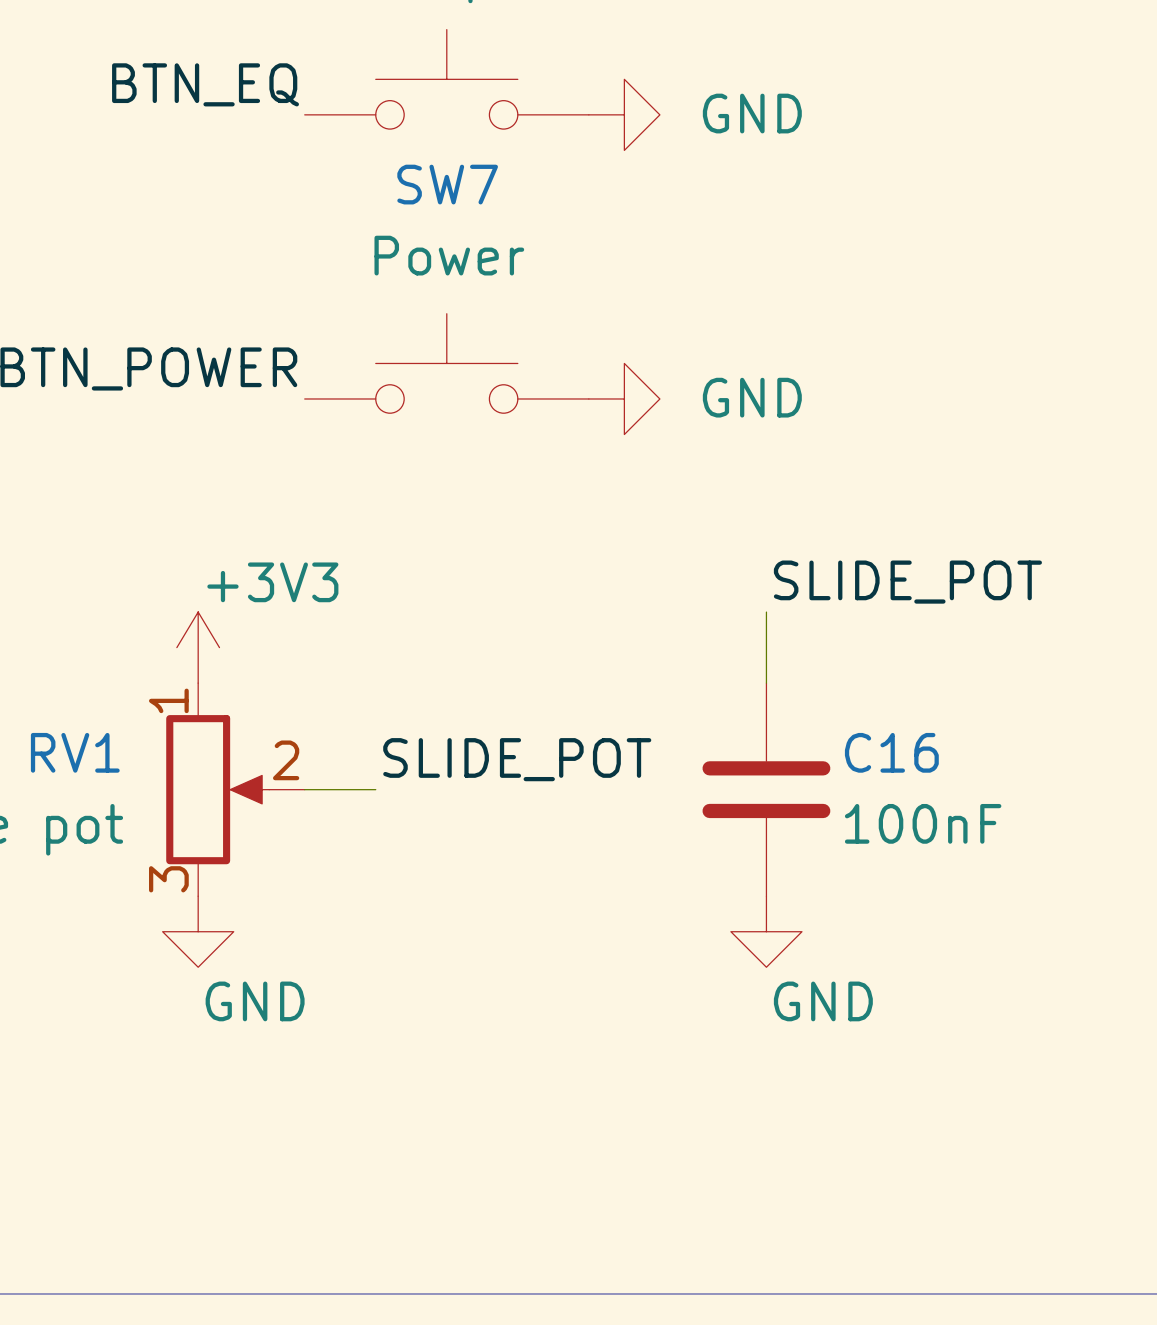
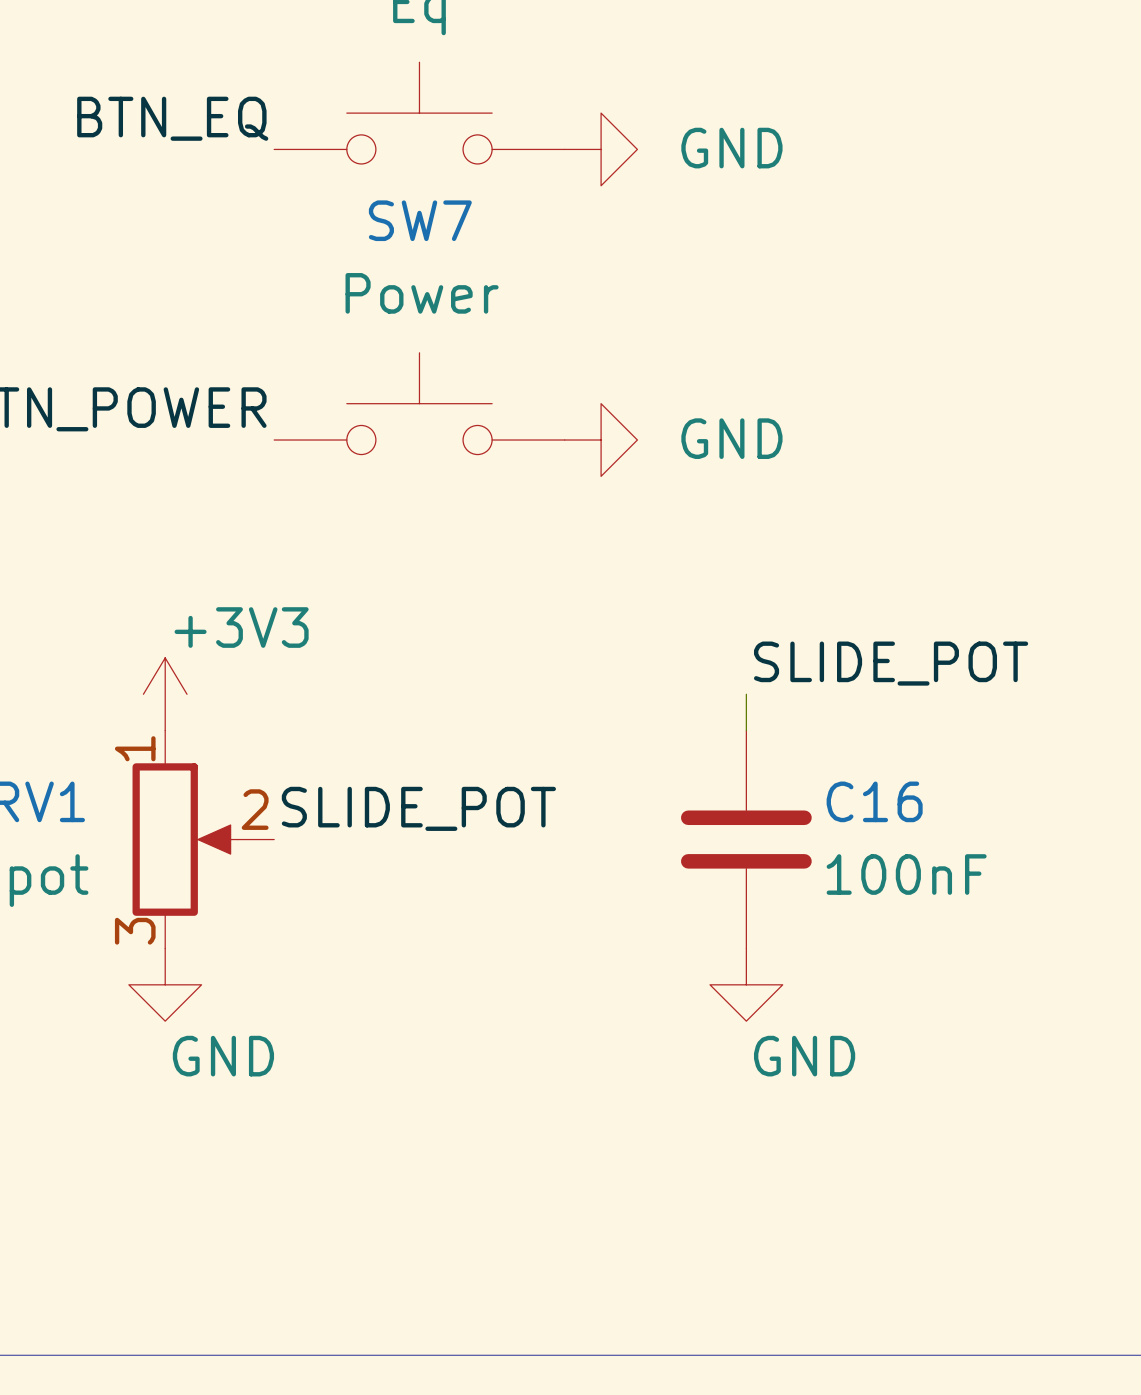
label position: SLIDE_POT (907, 582) -> SLIDE_POT (891, 663)
wire: (766, 612) (766, 647) -> none
label position: SLIDE_POT (517, 759) -> SLIDE_POT (418, 808)
wire: (304, 789) (375, 789) -> none

